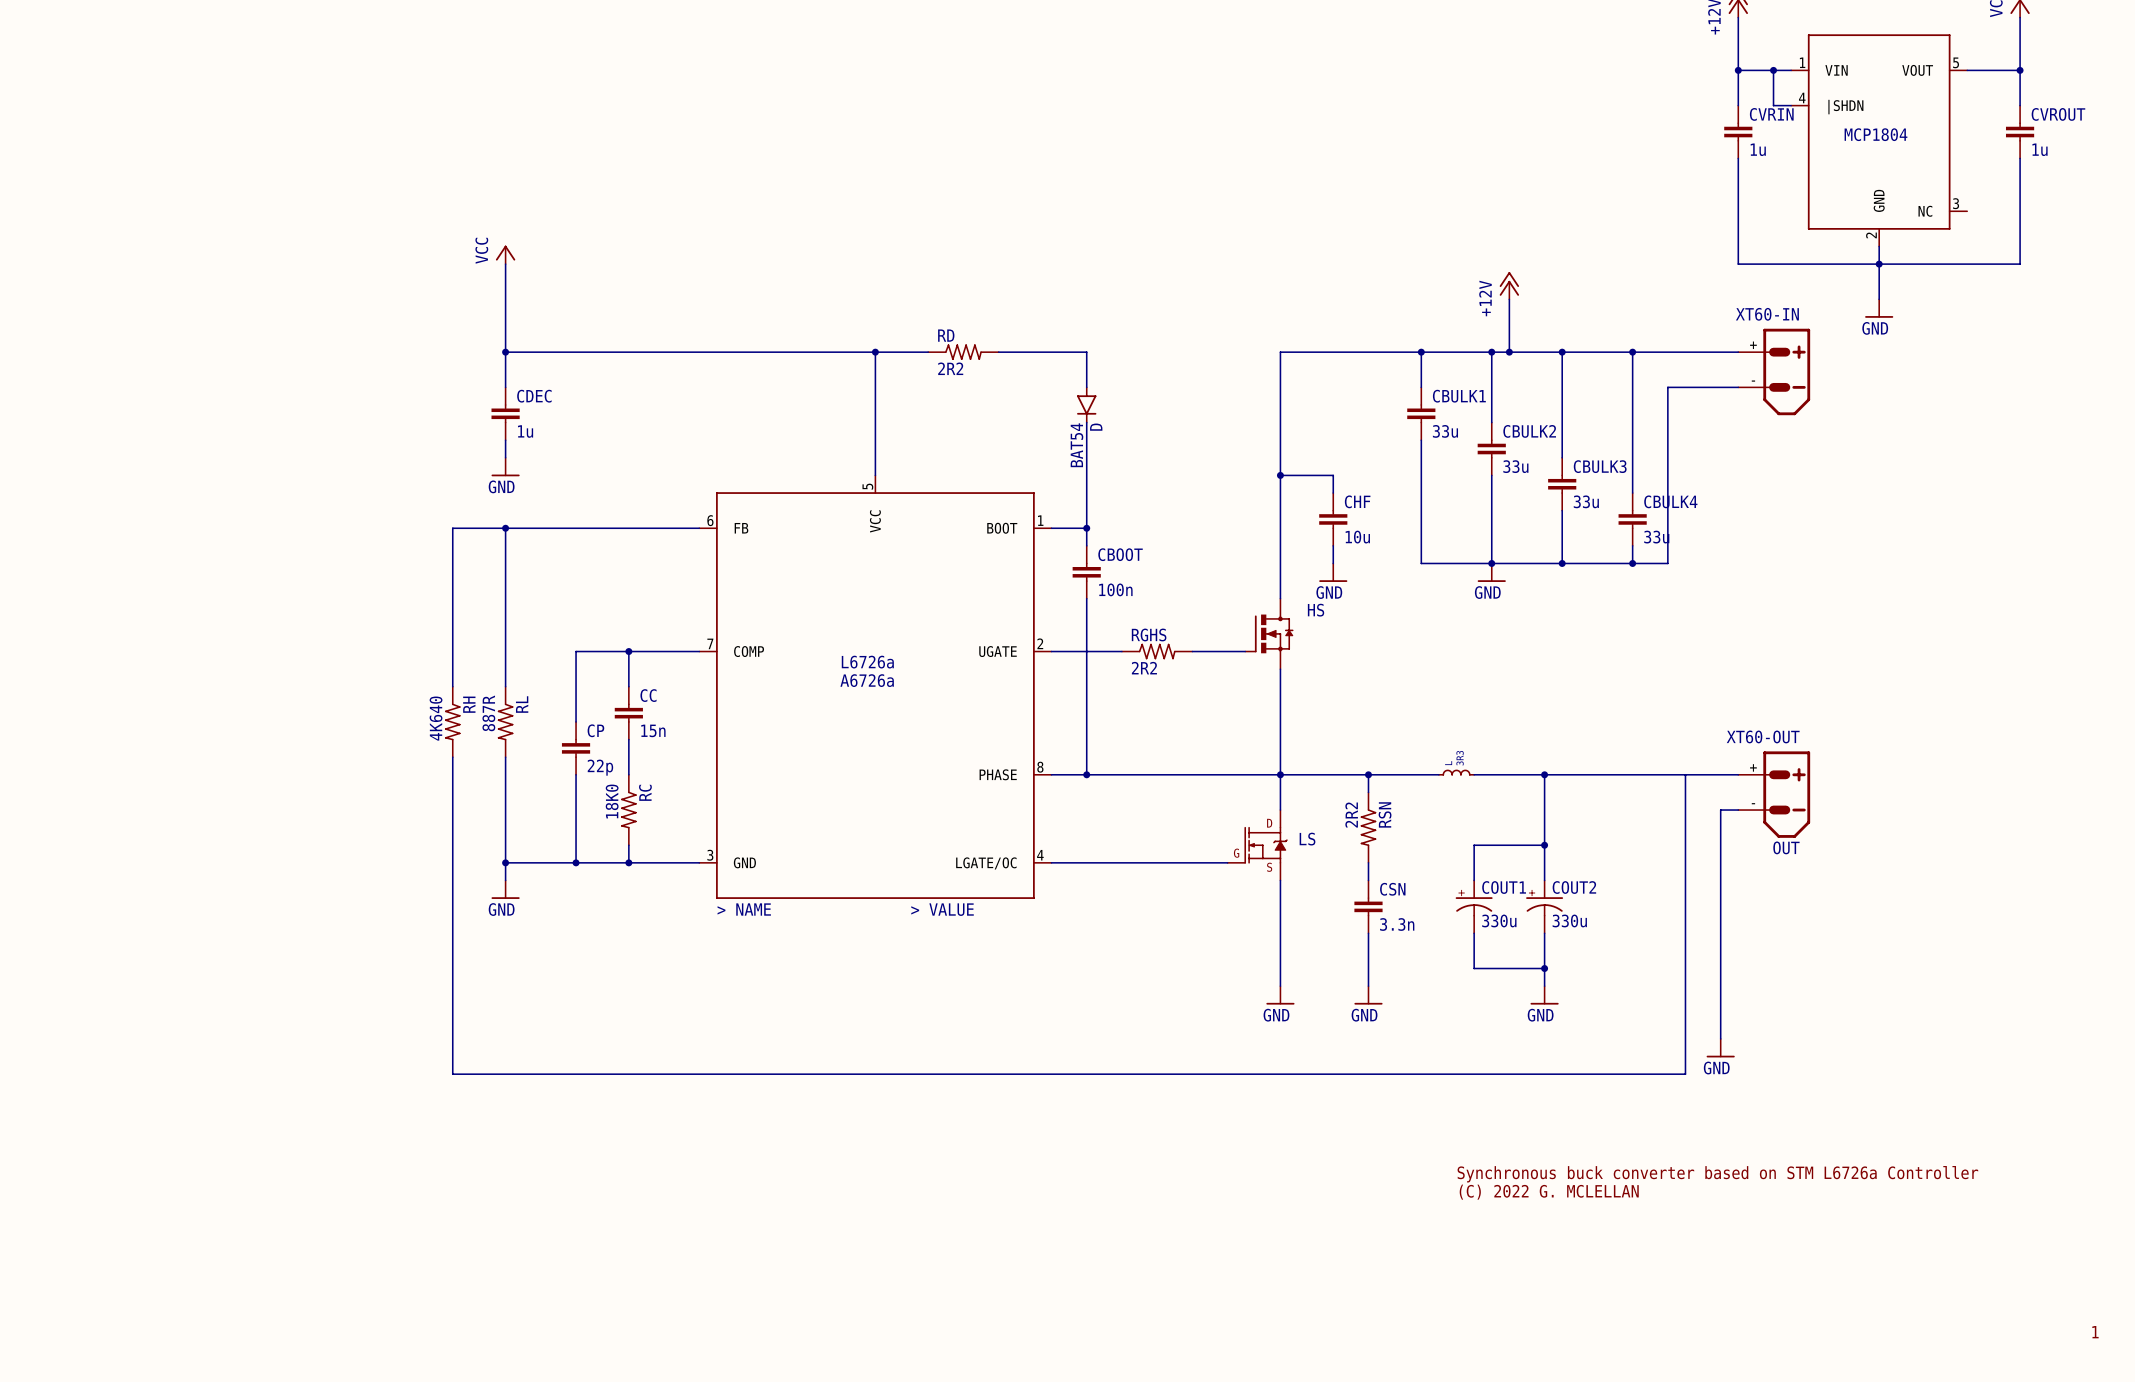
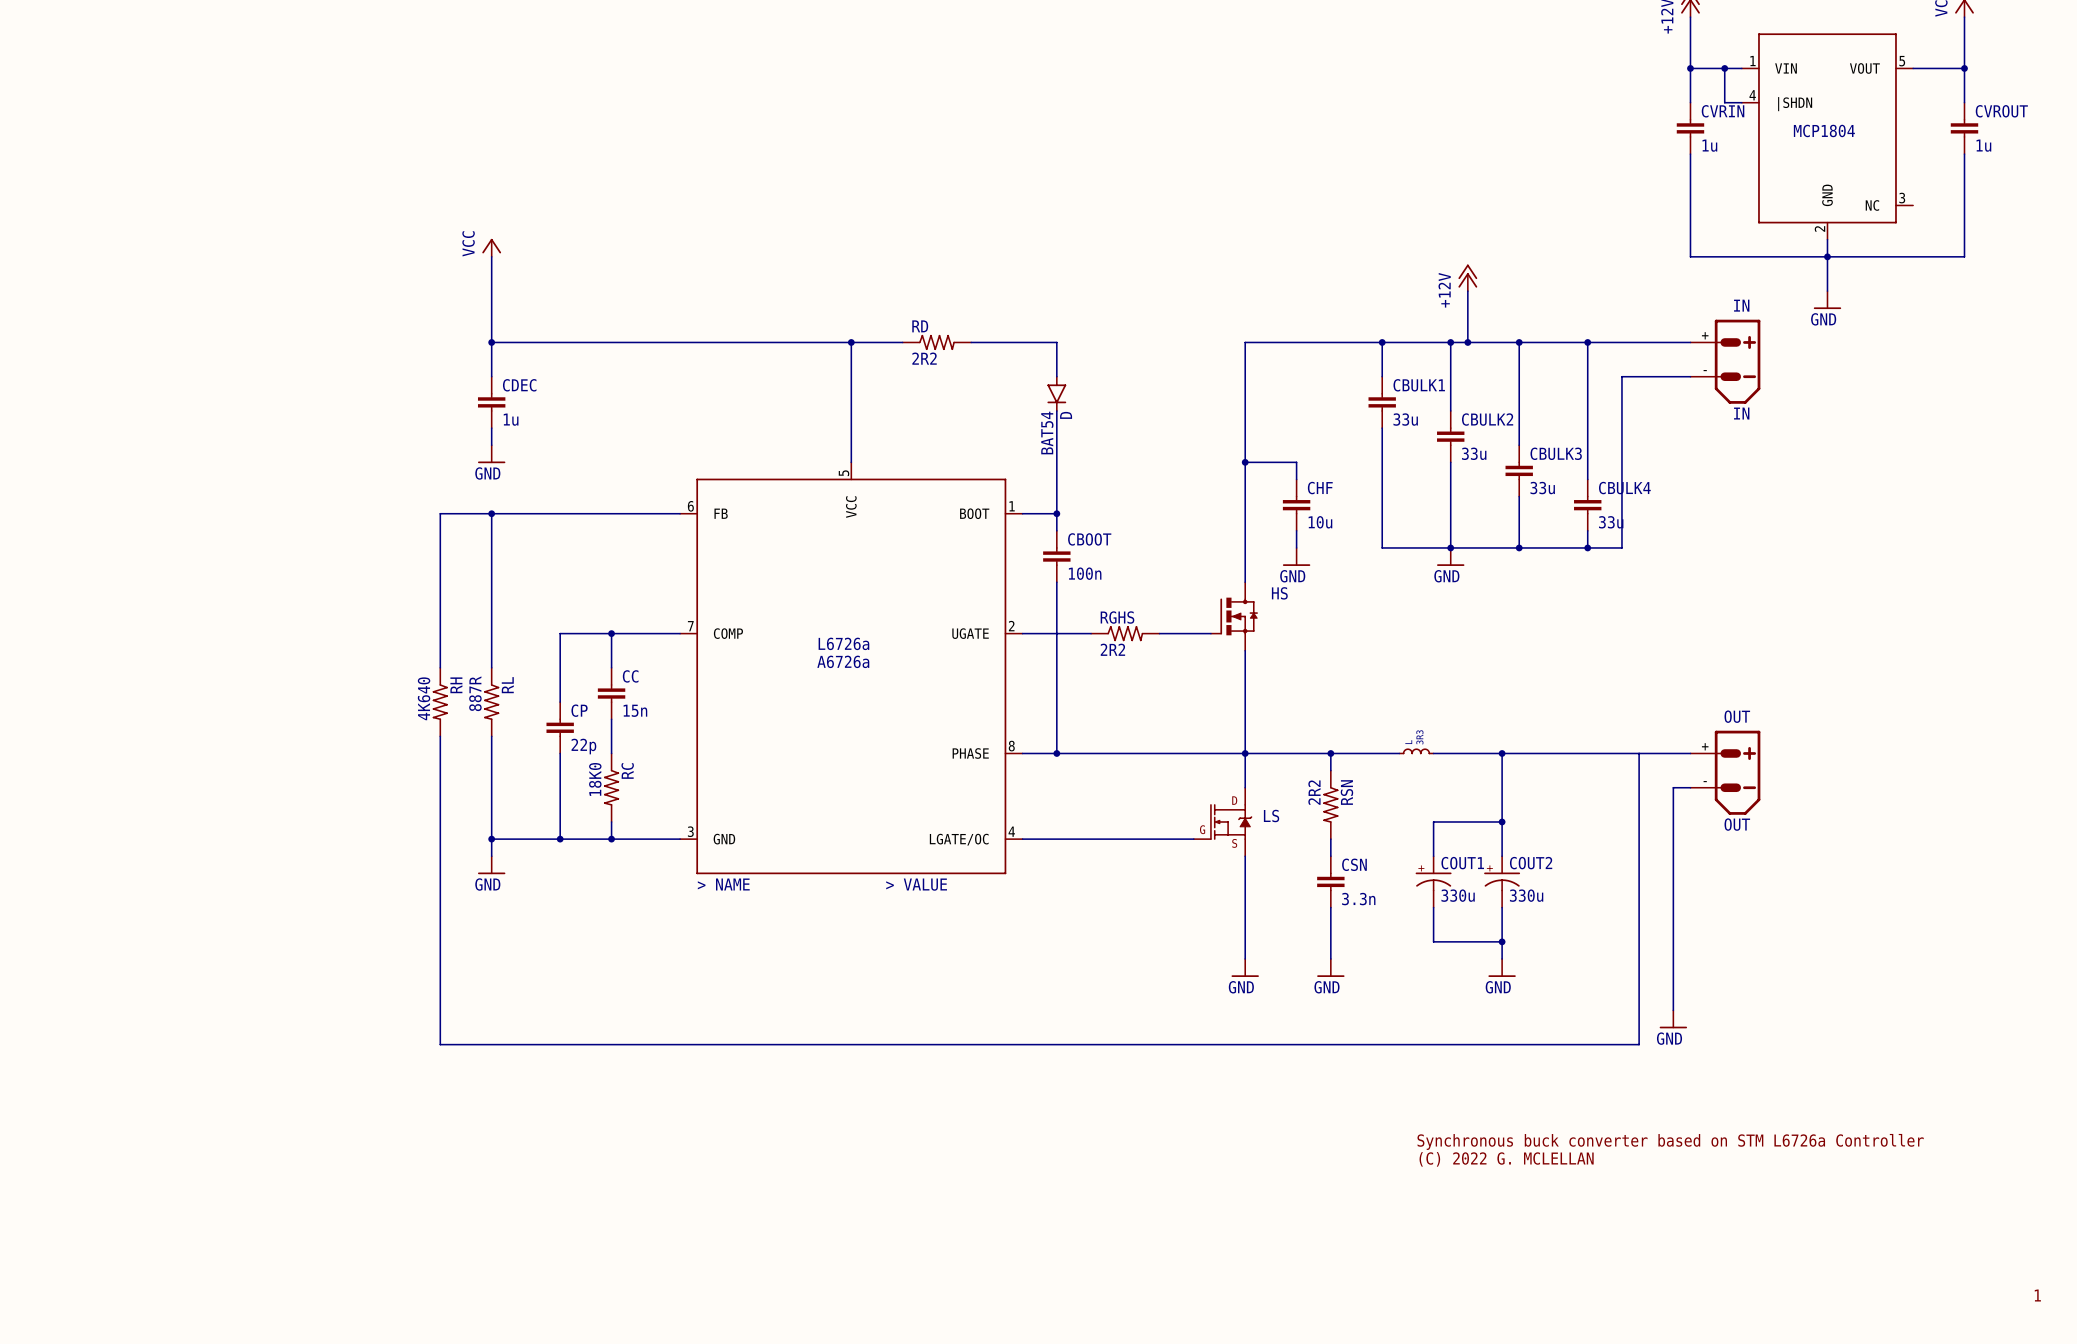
XT60-IN name: XT60-IN (1767, 314) -> IN (1741, 305)
XT60-IN value: none -> IN (1741, 413)
XT60-OUT name: XT60-OUT (1763, 736) -> OUT (1737, 716)

